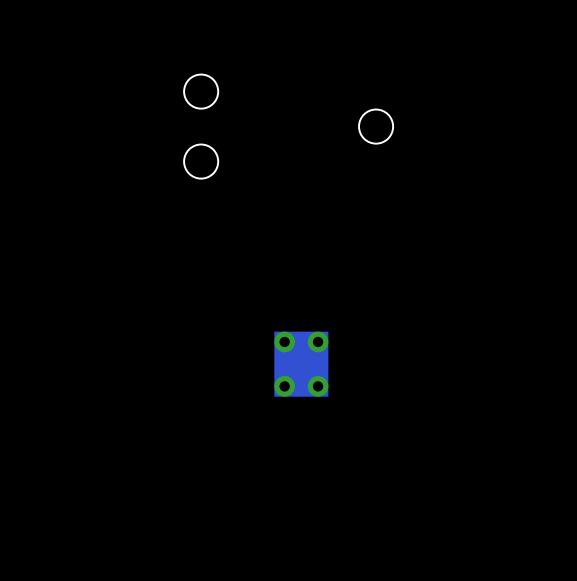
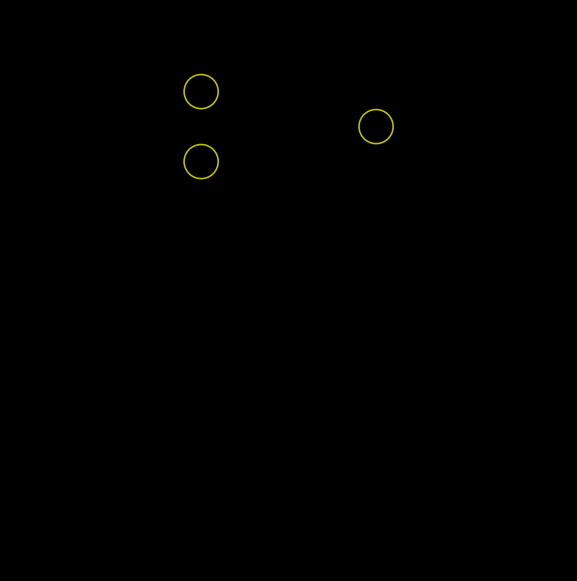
part: (301, 364) -> none

